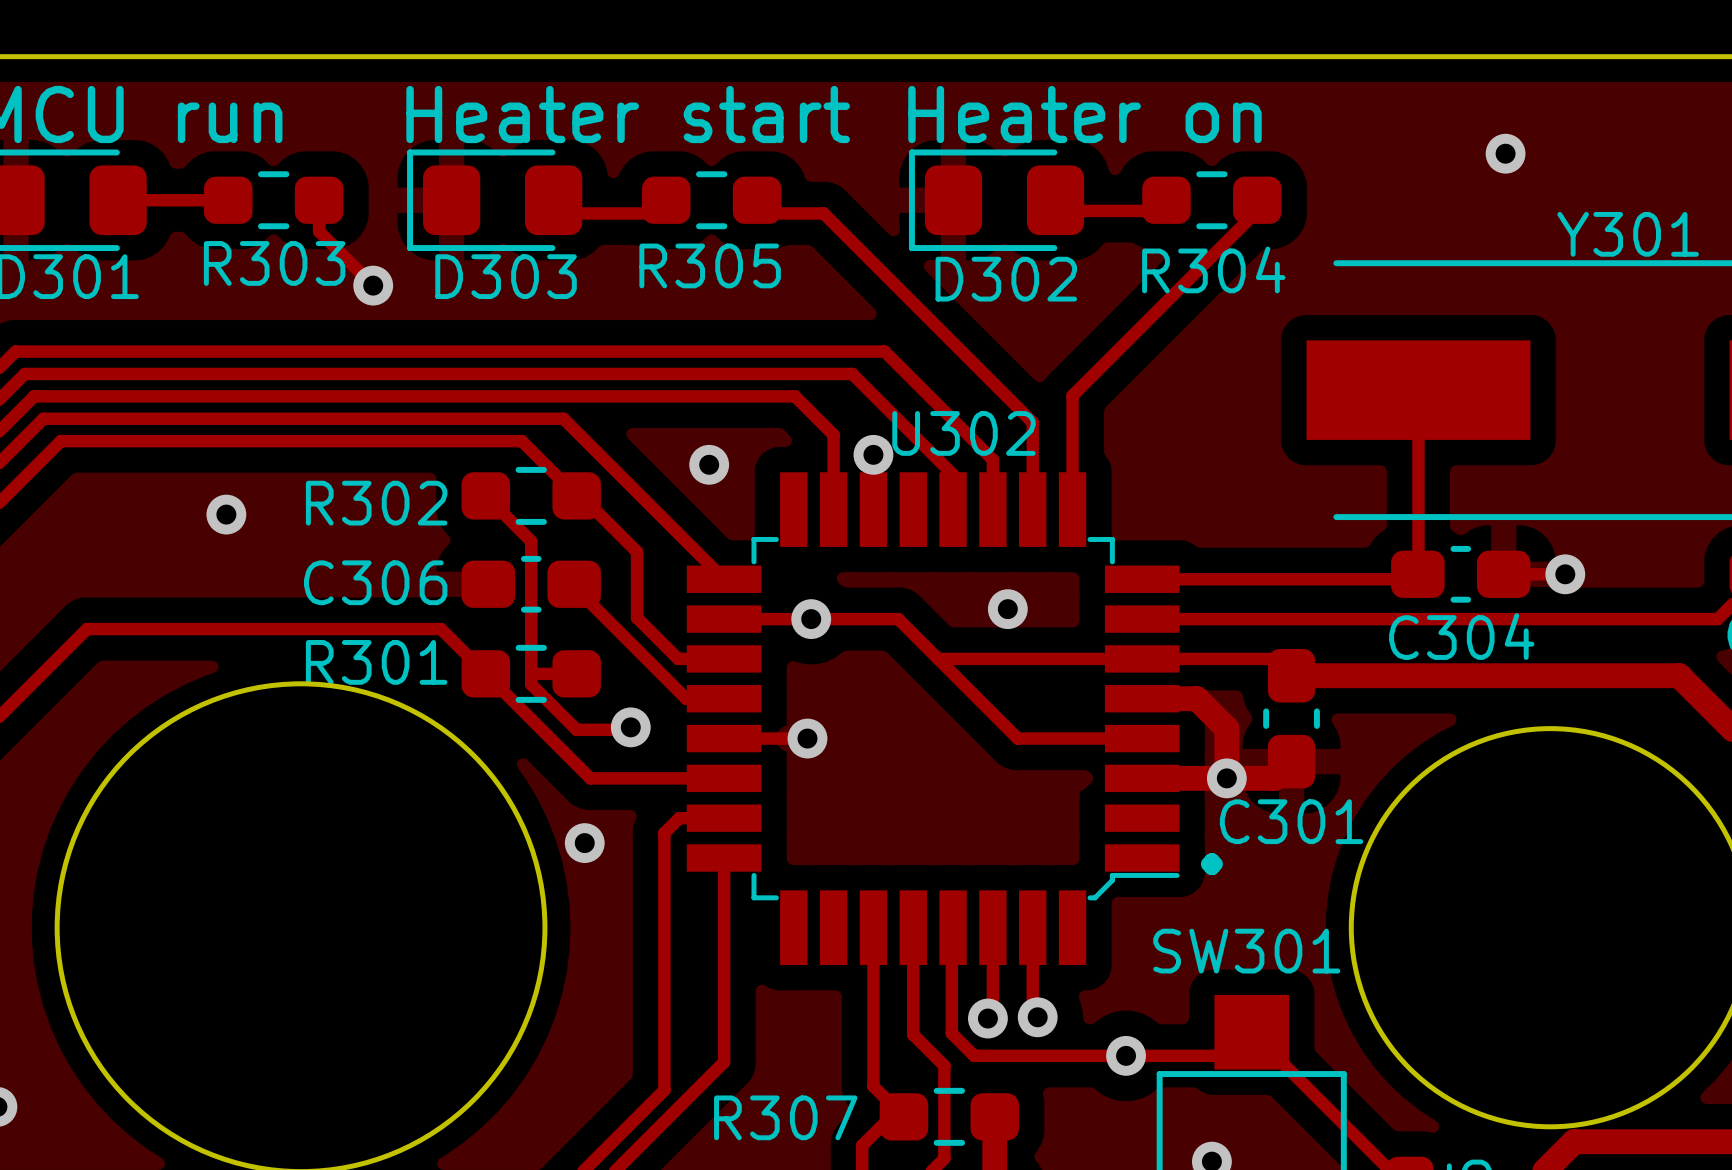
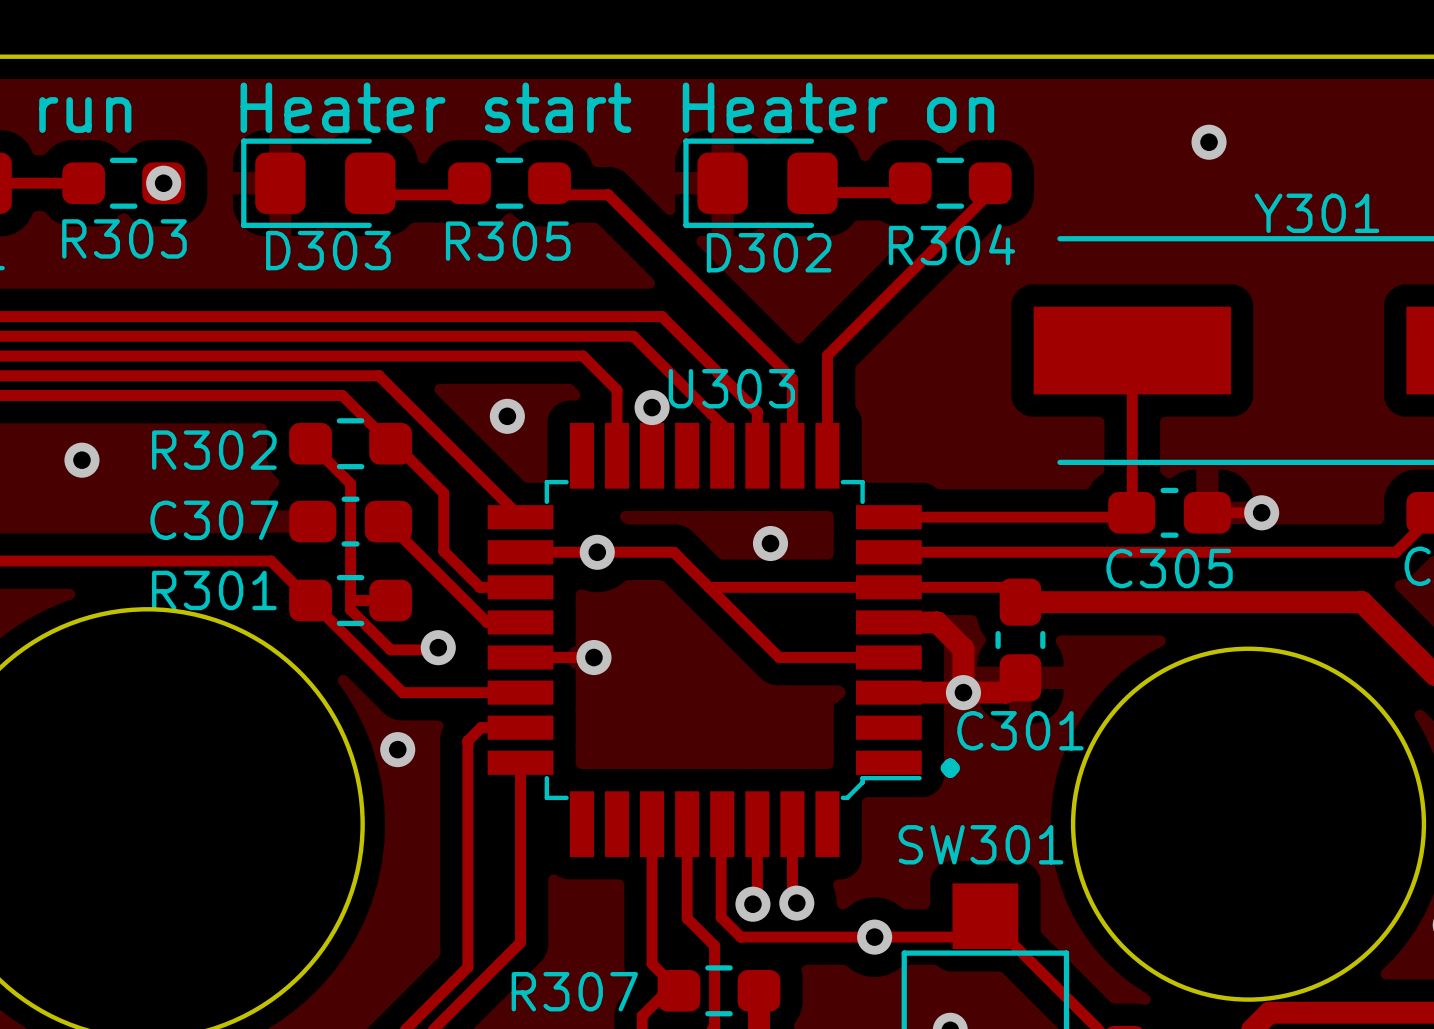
track: (319, 200) (319, 231) (373, 285) -> none
via position: (373, 285) -> (163, 183)
U302 name: U302 (963, 433) -> U303 (731, 388)
C306 name: C306 (375, 582) -> C307 (214, 520)
C304 name: C304 (1461, 636) -> C305 (1169, 568)

